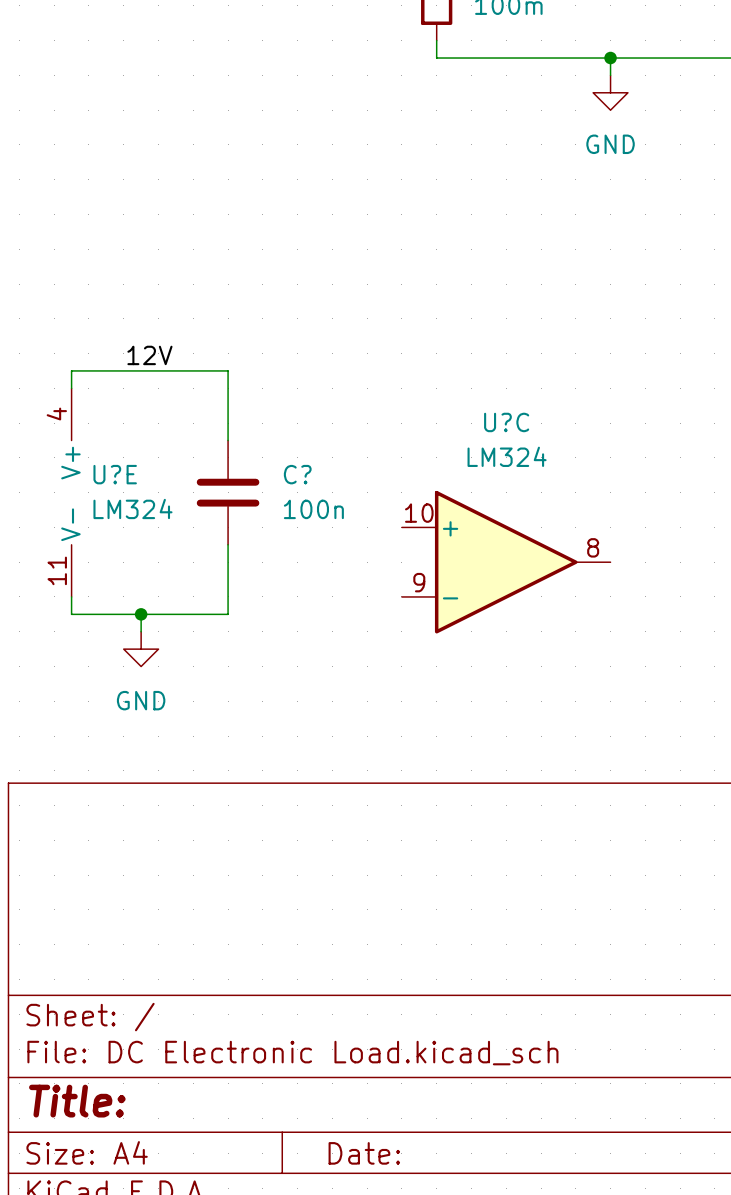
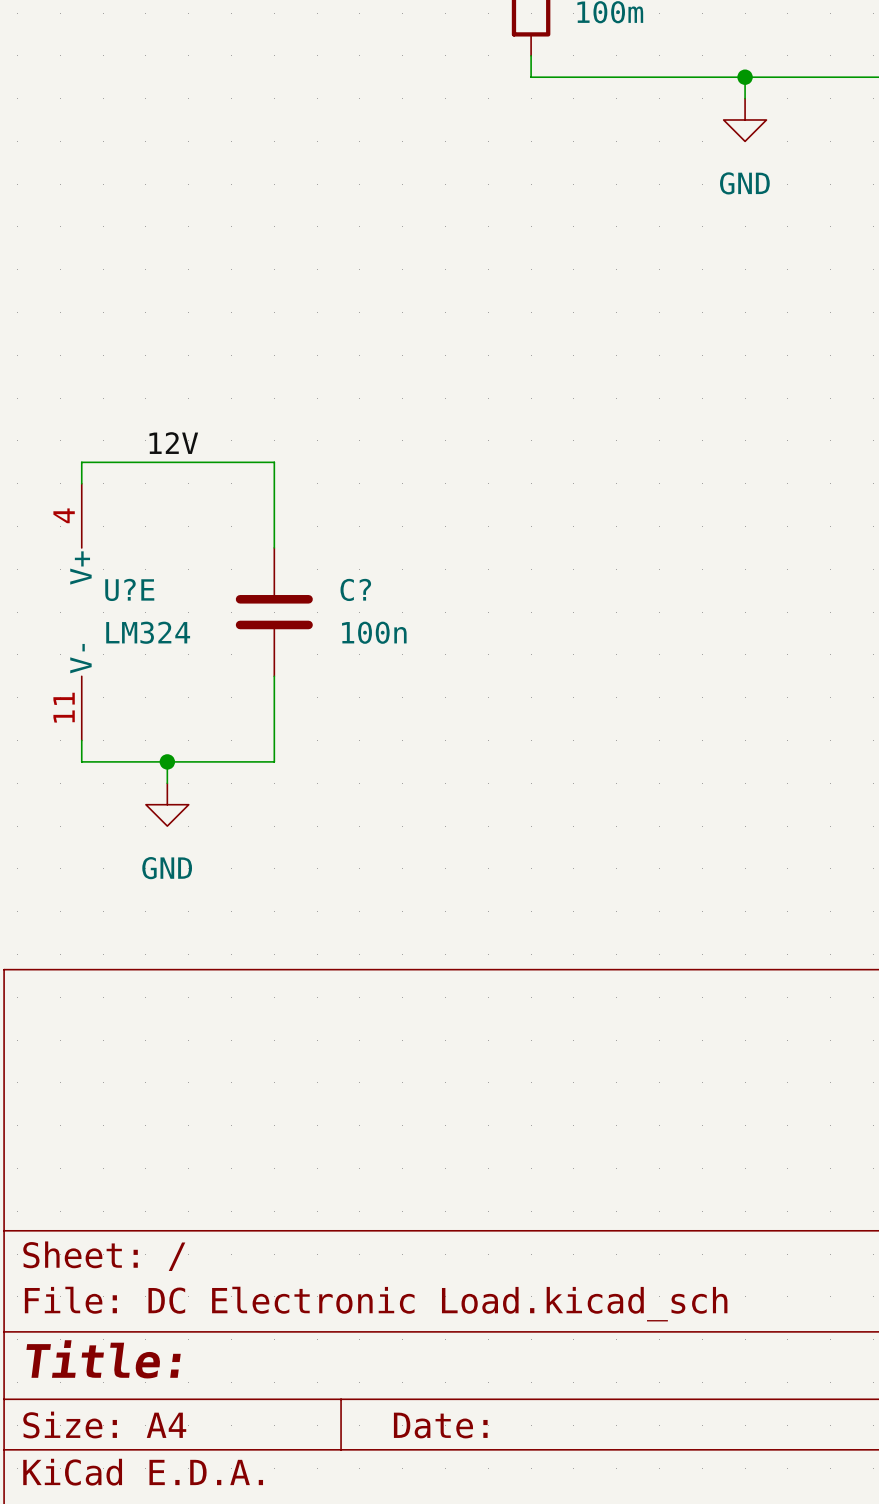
U?C: LM324 (506, 562) -> none

